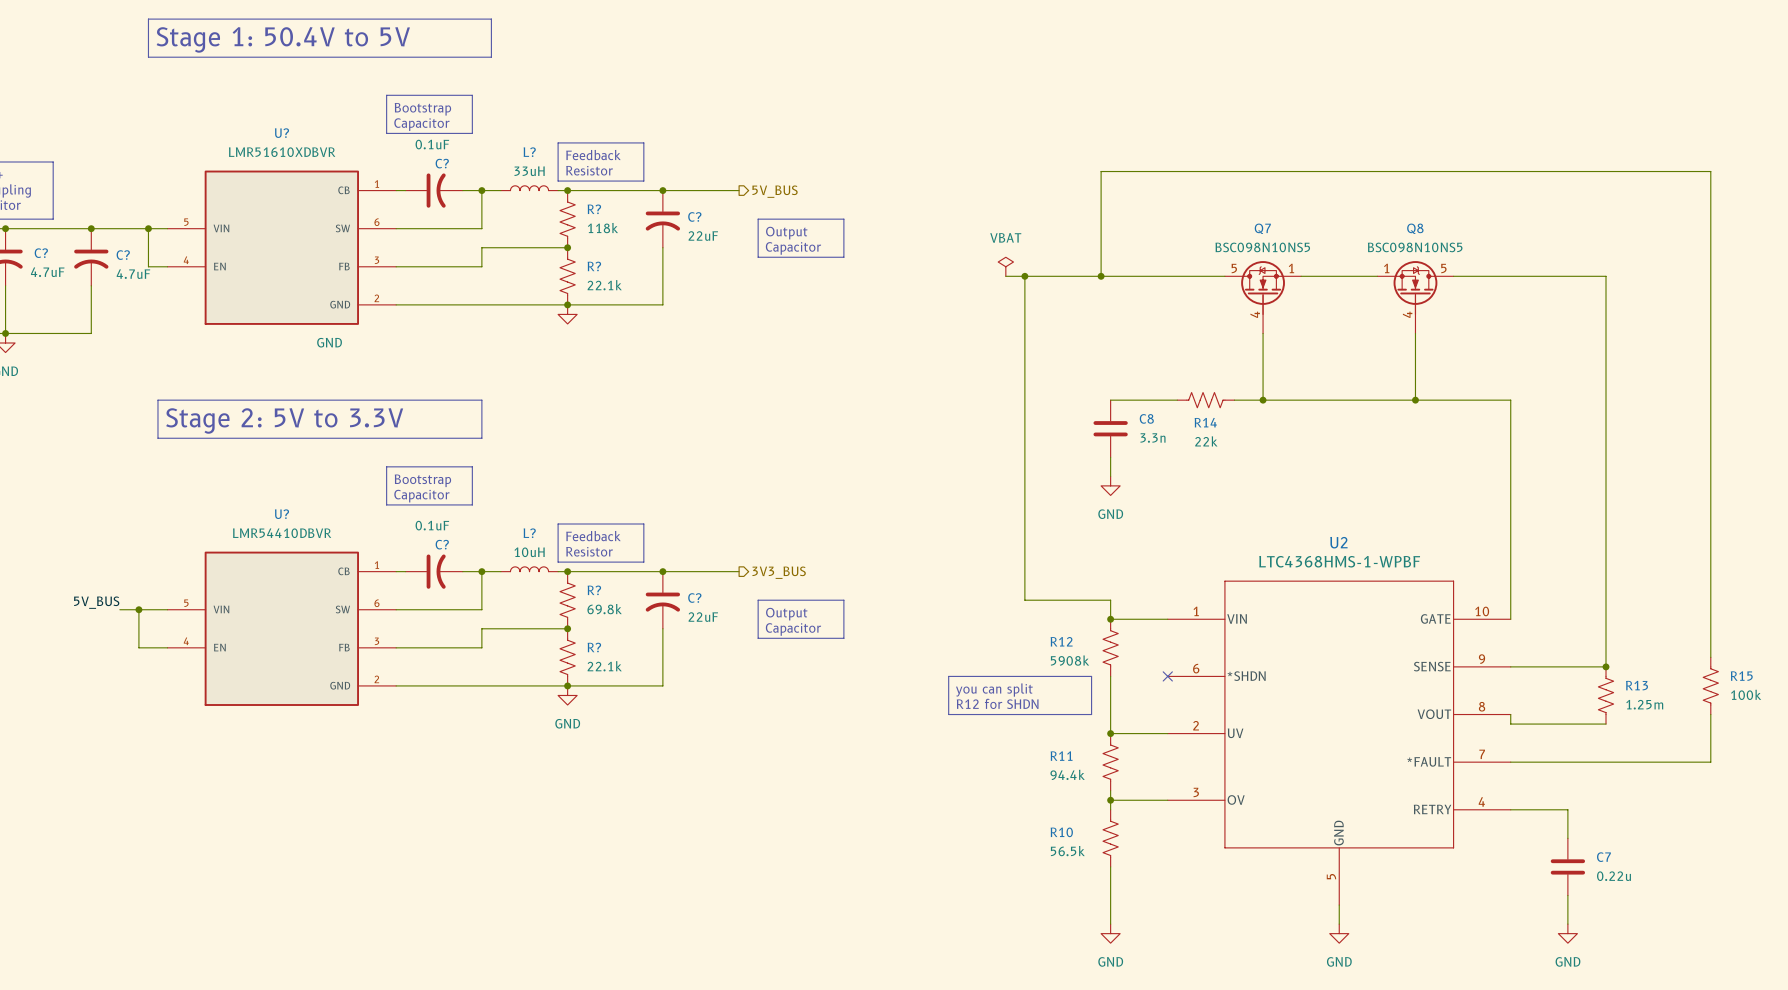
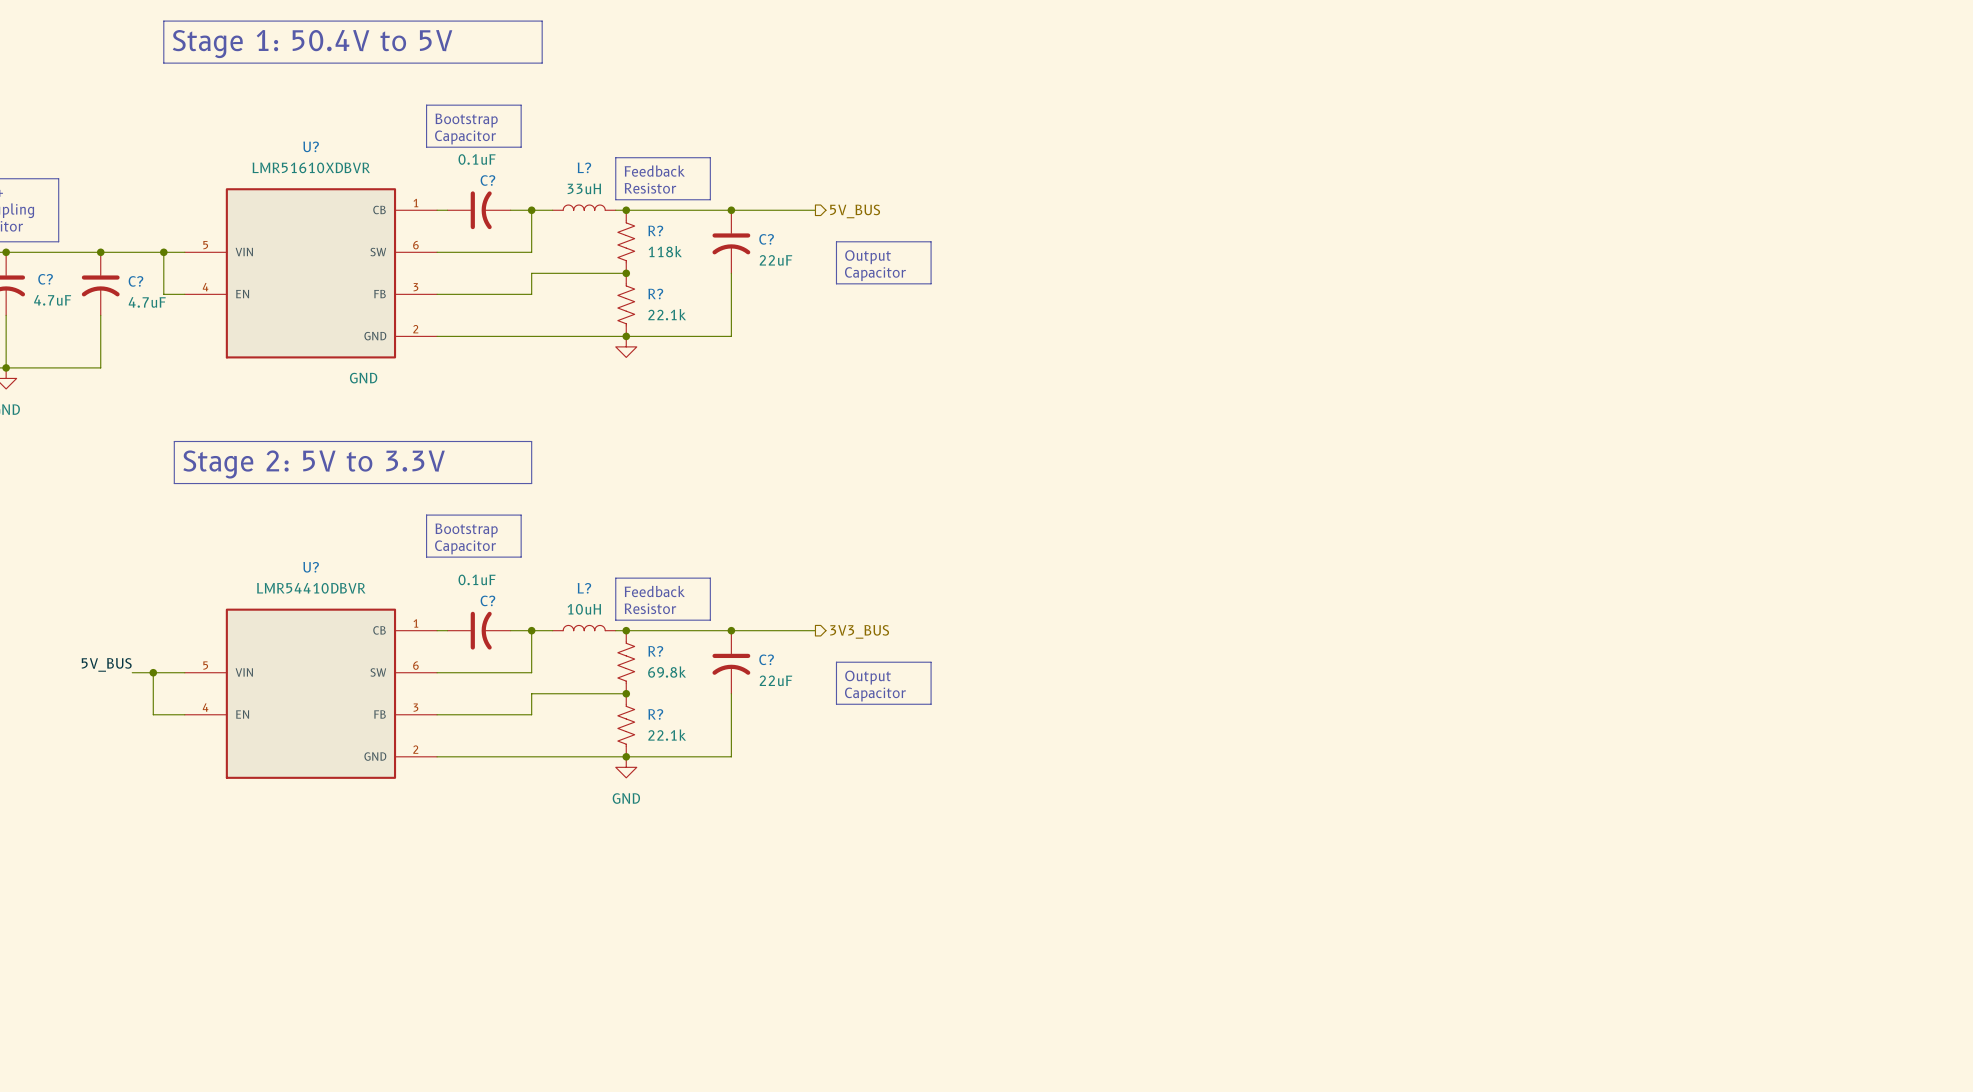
power symbol: VBAT (1005, 266) -> none
wire: (1005, 276) (1224, 276) -> none
wire: (1024, 276) (1024, 600) (1110, 600) (1110, 619) (1167, 619) -> none
junction: (1024, 276) -> none
wire: (1101, 276) (1101, 171) (1710, 171) (1710, 657) -> none
junction: (1101, 276) -> none
wire: (1301, 276) (1377, 276) -> none
wire: (1453, 276) (1606, 276) (1606, 666) (1510, 666) -> none
Q7: BSC098N10NS5 (1263, 297) -> none
Q8: BSC098N10NS5 (1415, 297) -> none
wire: (1263, 333) (1263, 400) -> none
wire: (1415, 333) (1415, 400) -> none
wire: (1110, 400) (1177, 400) -> none
R14: 22k (1205, 400) -> none
wire: (1234, 400) (1510, 400) (1510, 619) -> none
junction: (1263, 400) -> none
junction: (1415, 400) -> none
C8: 3.3n (1110, 428) -> none
wire: (1110, 457) (1110, 476) -> none
power symbol: GND (1110, 485) -> none
junction: (1110, 619) -> none
R12: 5908k (1110, 647) -> none
junction: (1606, 666) -> none
line: (948, 676) (1091, 676) (1091, 714) (948, 714) (948, 676) -> none
wire: (1110, 676) (1110, 733) (1167, 733) -> none
no-connect mark: (1167, 676) -> none
R15: 100k (1710, 685) -> none
text: you can split (994, 690) -> none
R13: 1.25m (1606, 695) -> none
text: R12 for SHDN (997, 703) -> none
wire: (1510, 714) (1510, 724) (1606, 724) -> none
wire: (1710, 714) (1710, 762) (1510, 762) -> none
junction: (1110, 733) -> none
U2: LTC4368HMS-1-WPBF (1339, 742) -> none
R11: 94.4k (1110, 762) -> none
wire: (1110, 790) (1110, 809) -> none
wire: (1110, 800) (1167, 800) -> none
junction: (1110, 800) -> none
wire: (1510, 809) (1567, 809) (1567, 838) -> none
R10: 56.5k (1110, 838) -> none
wire: (1110, 866) (1110, 924) -> none
C7: 0.22u (1567, 866) -> none
wire: (1567, 895) (1567, 924) -> none
wire: (1339, 905) (1339, 924) -> none
power symbol: GND (1110, 933) -> none
power symbol: GND (1339, 933) -> none
power symbol: GND (1567, 933) -> none

